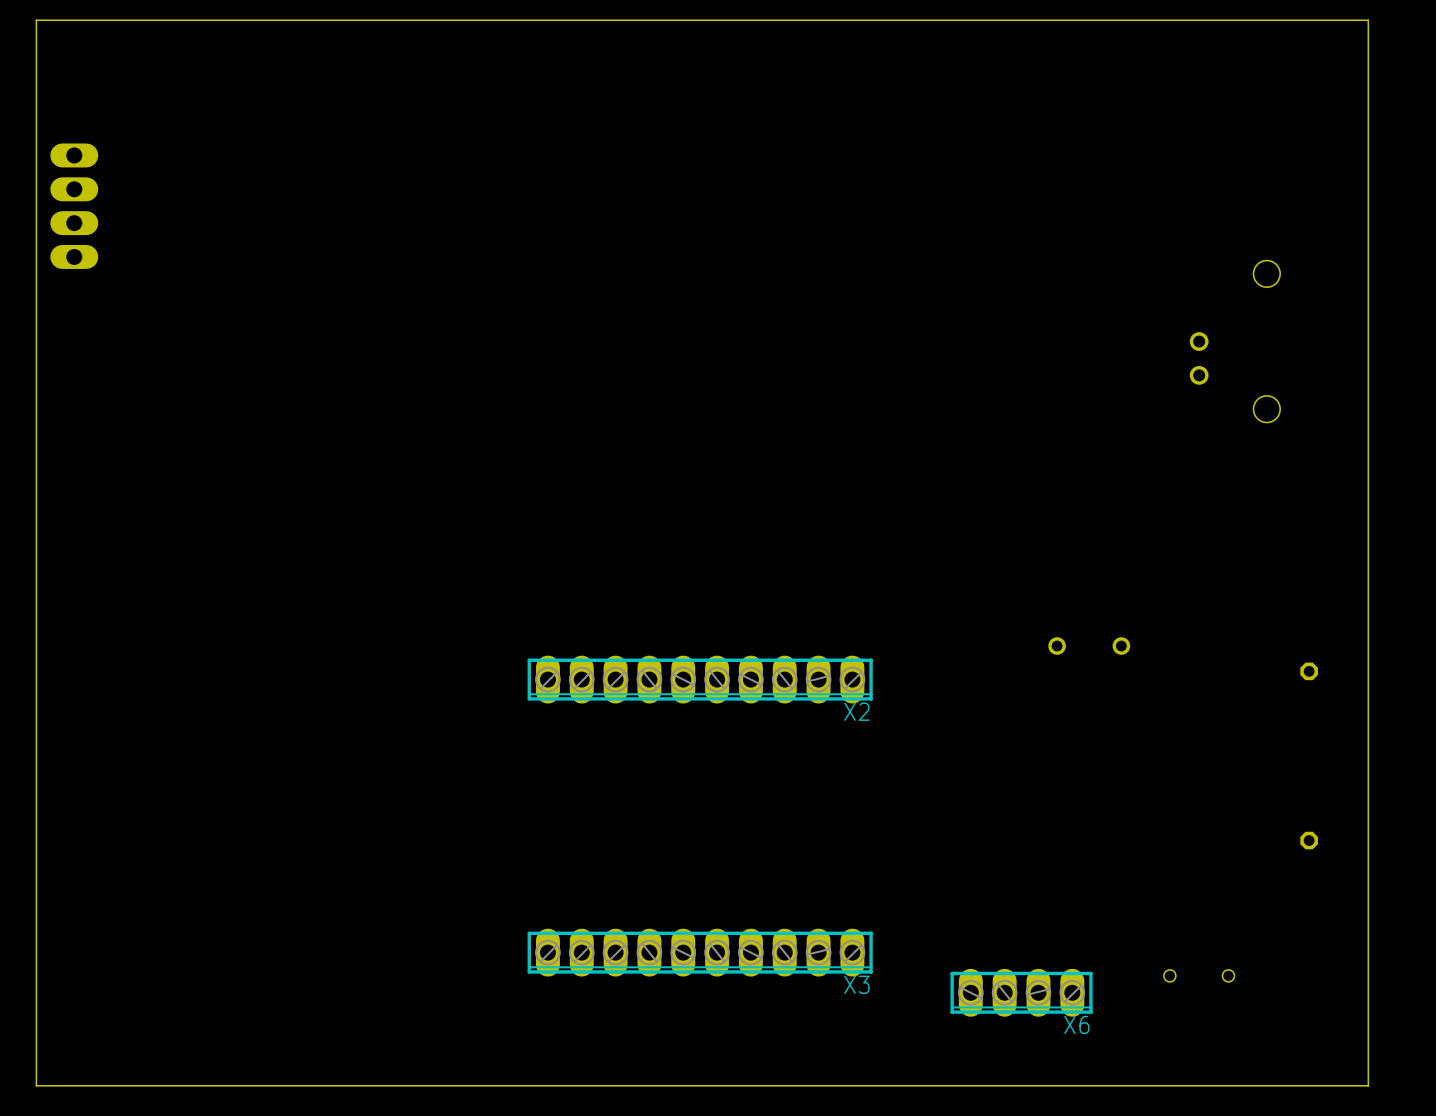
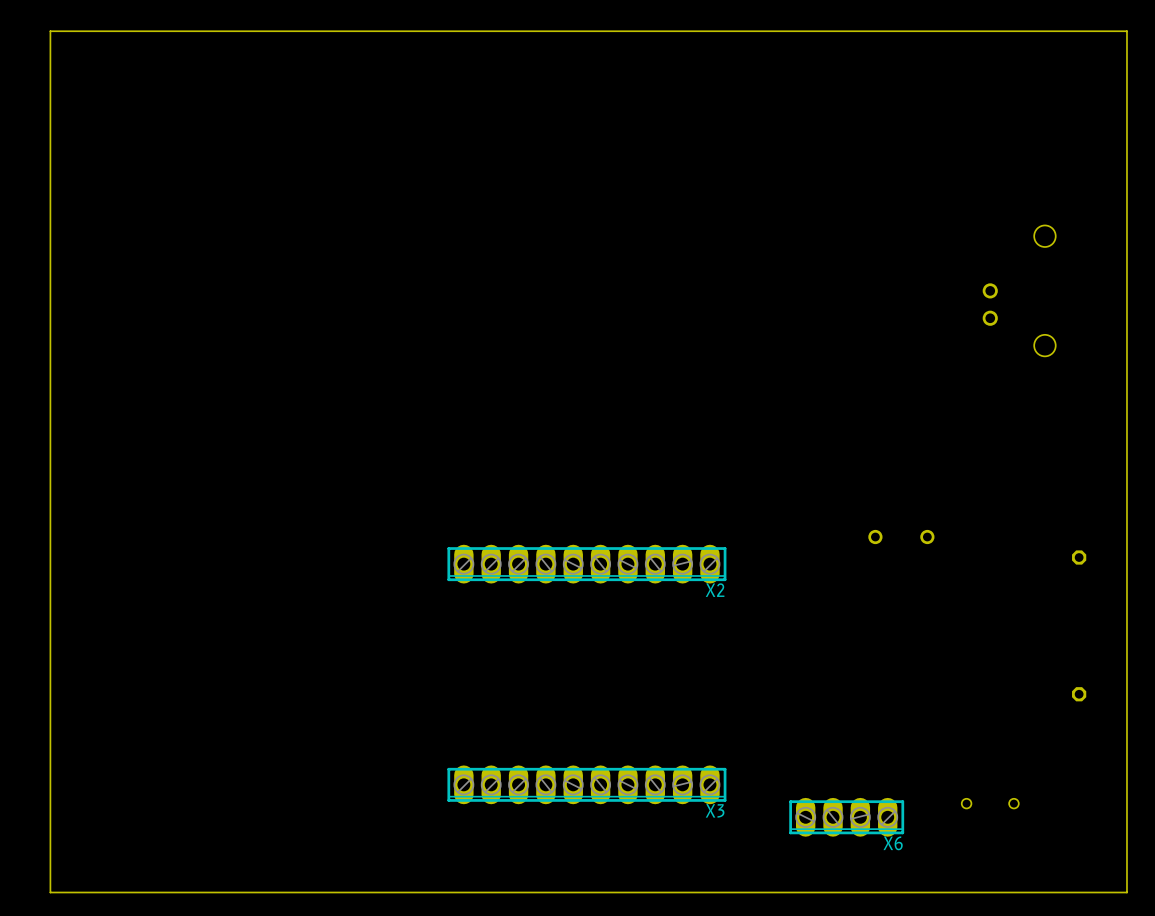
part: (74, 206) -> none

